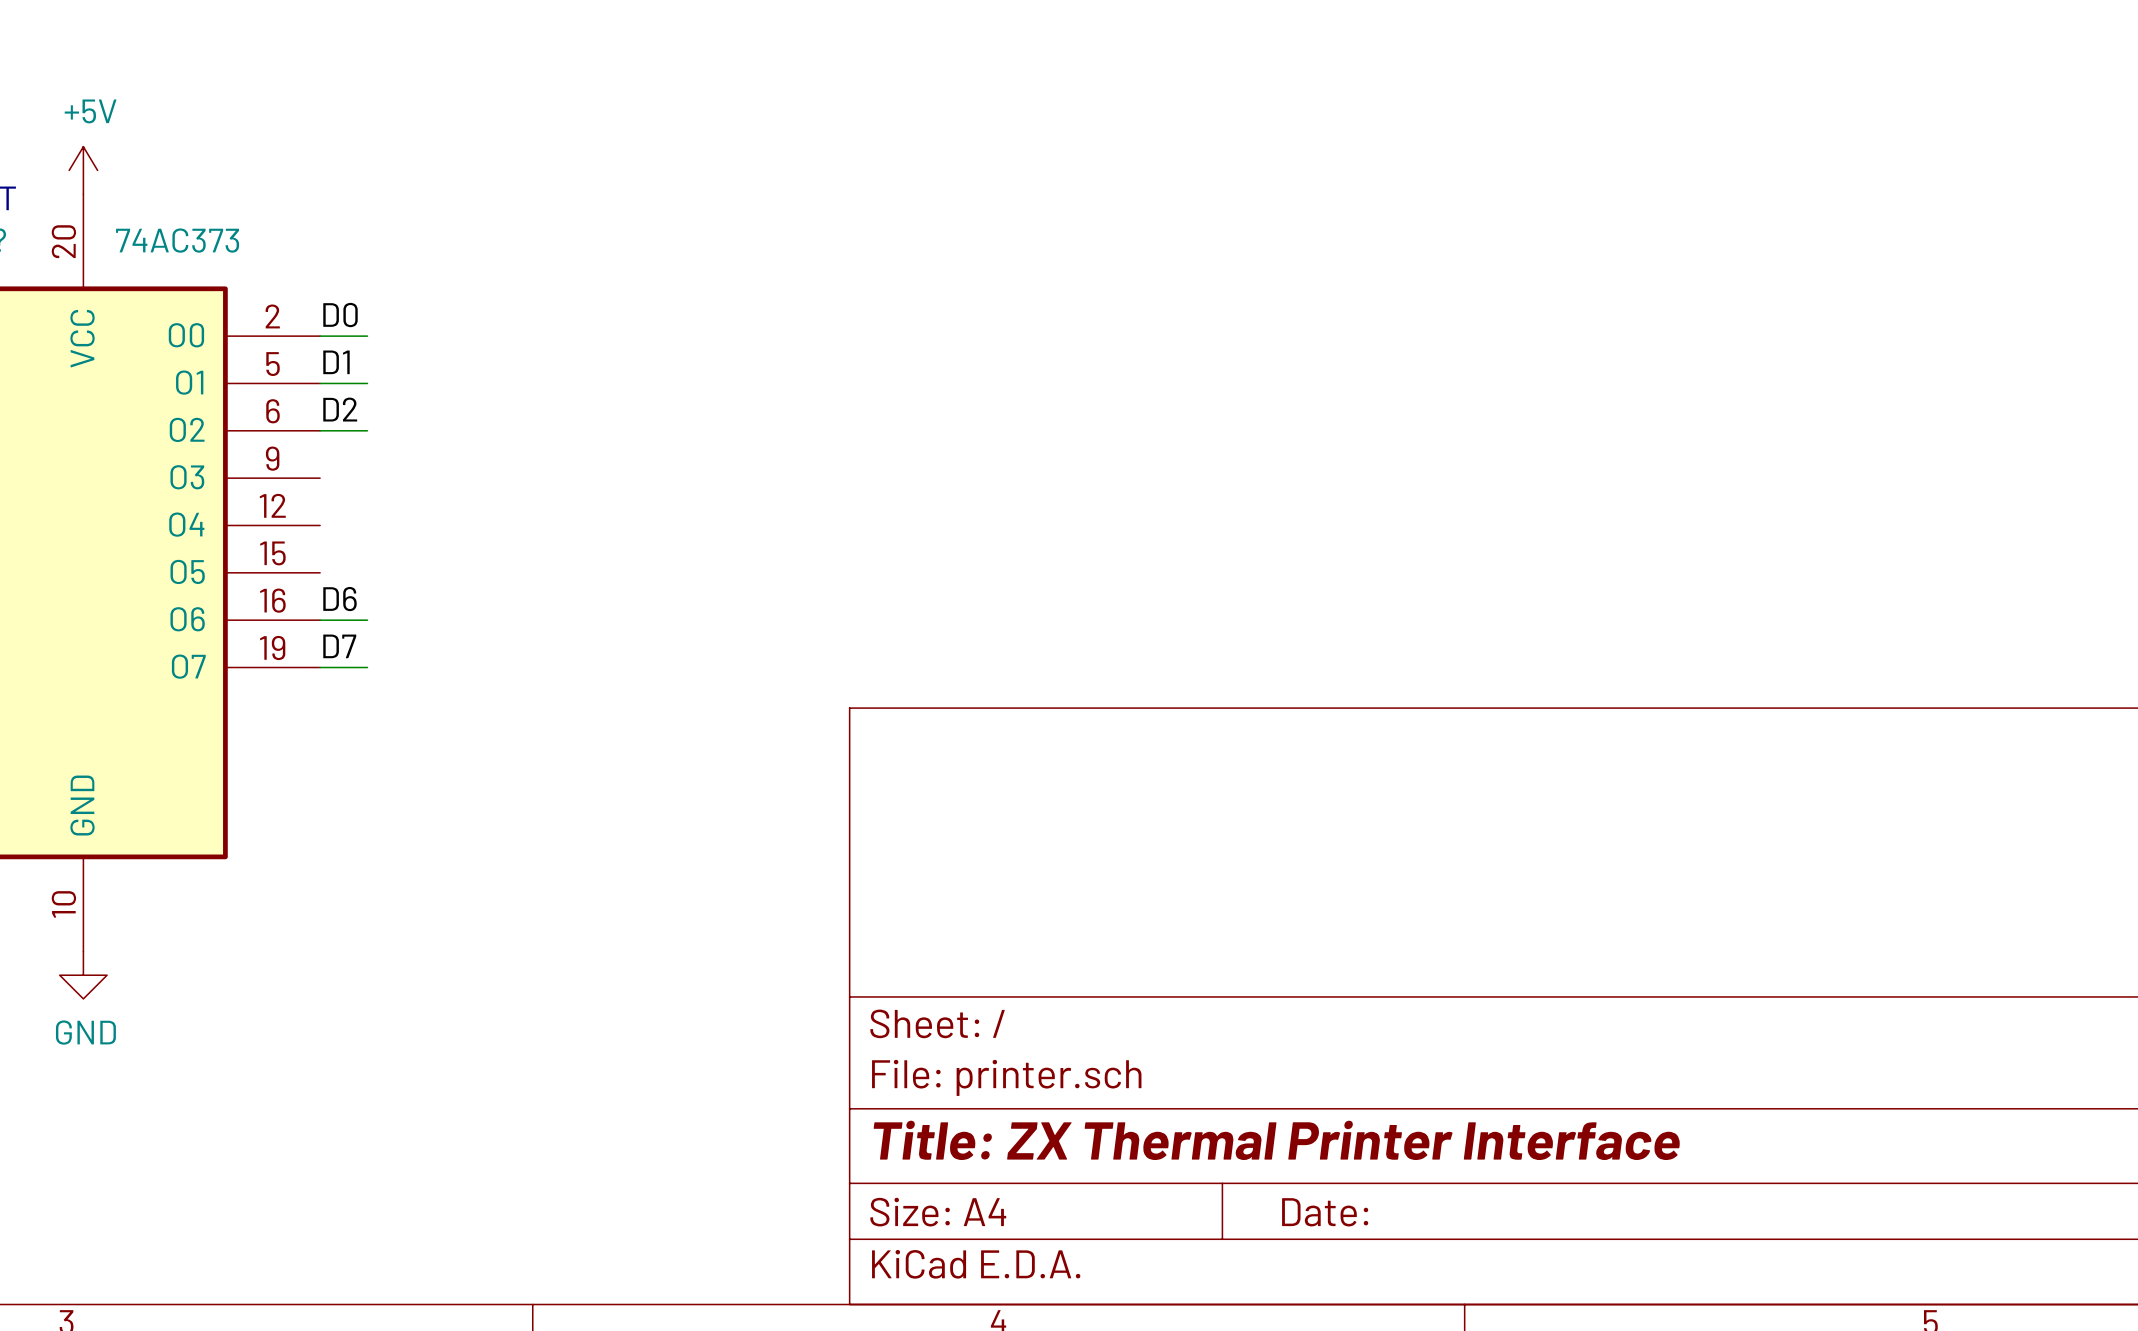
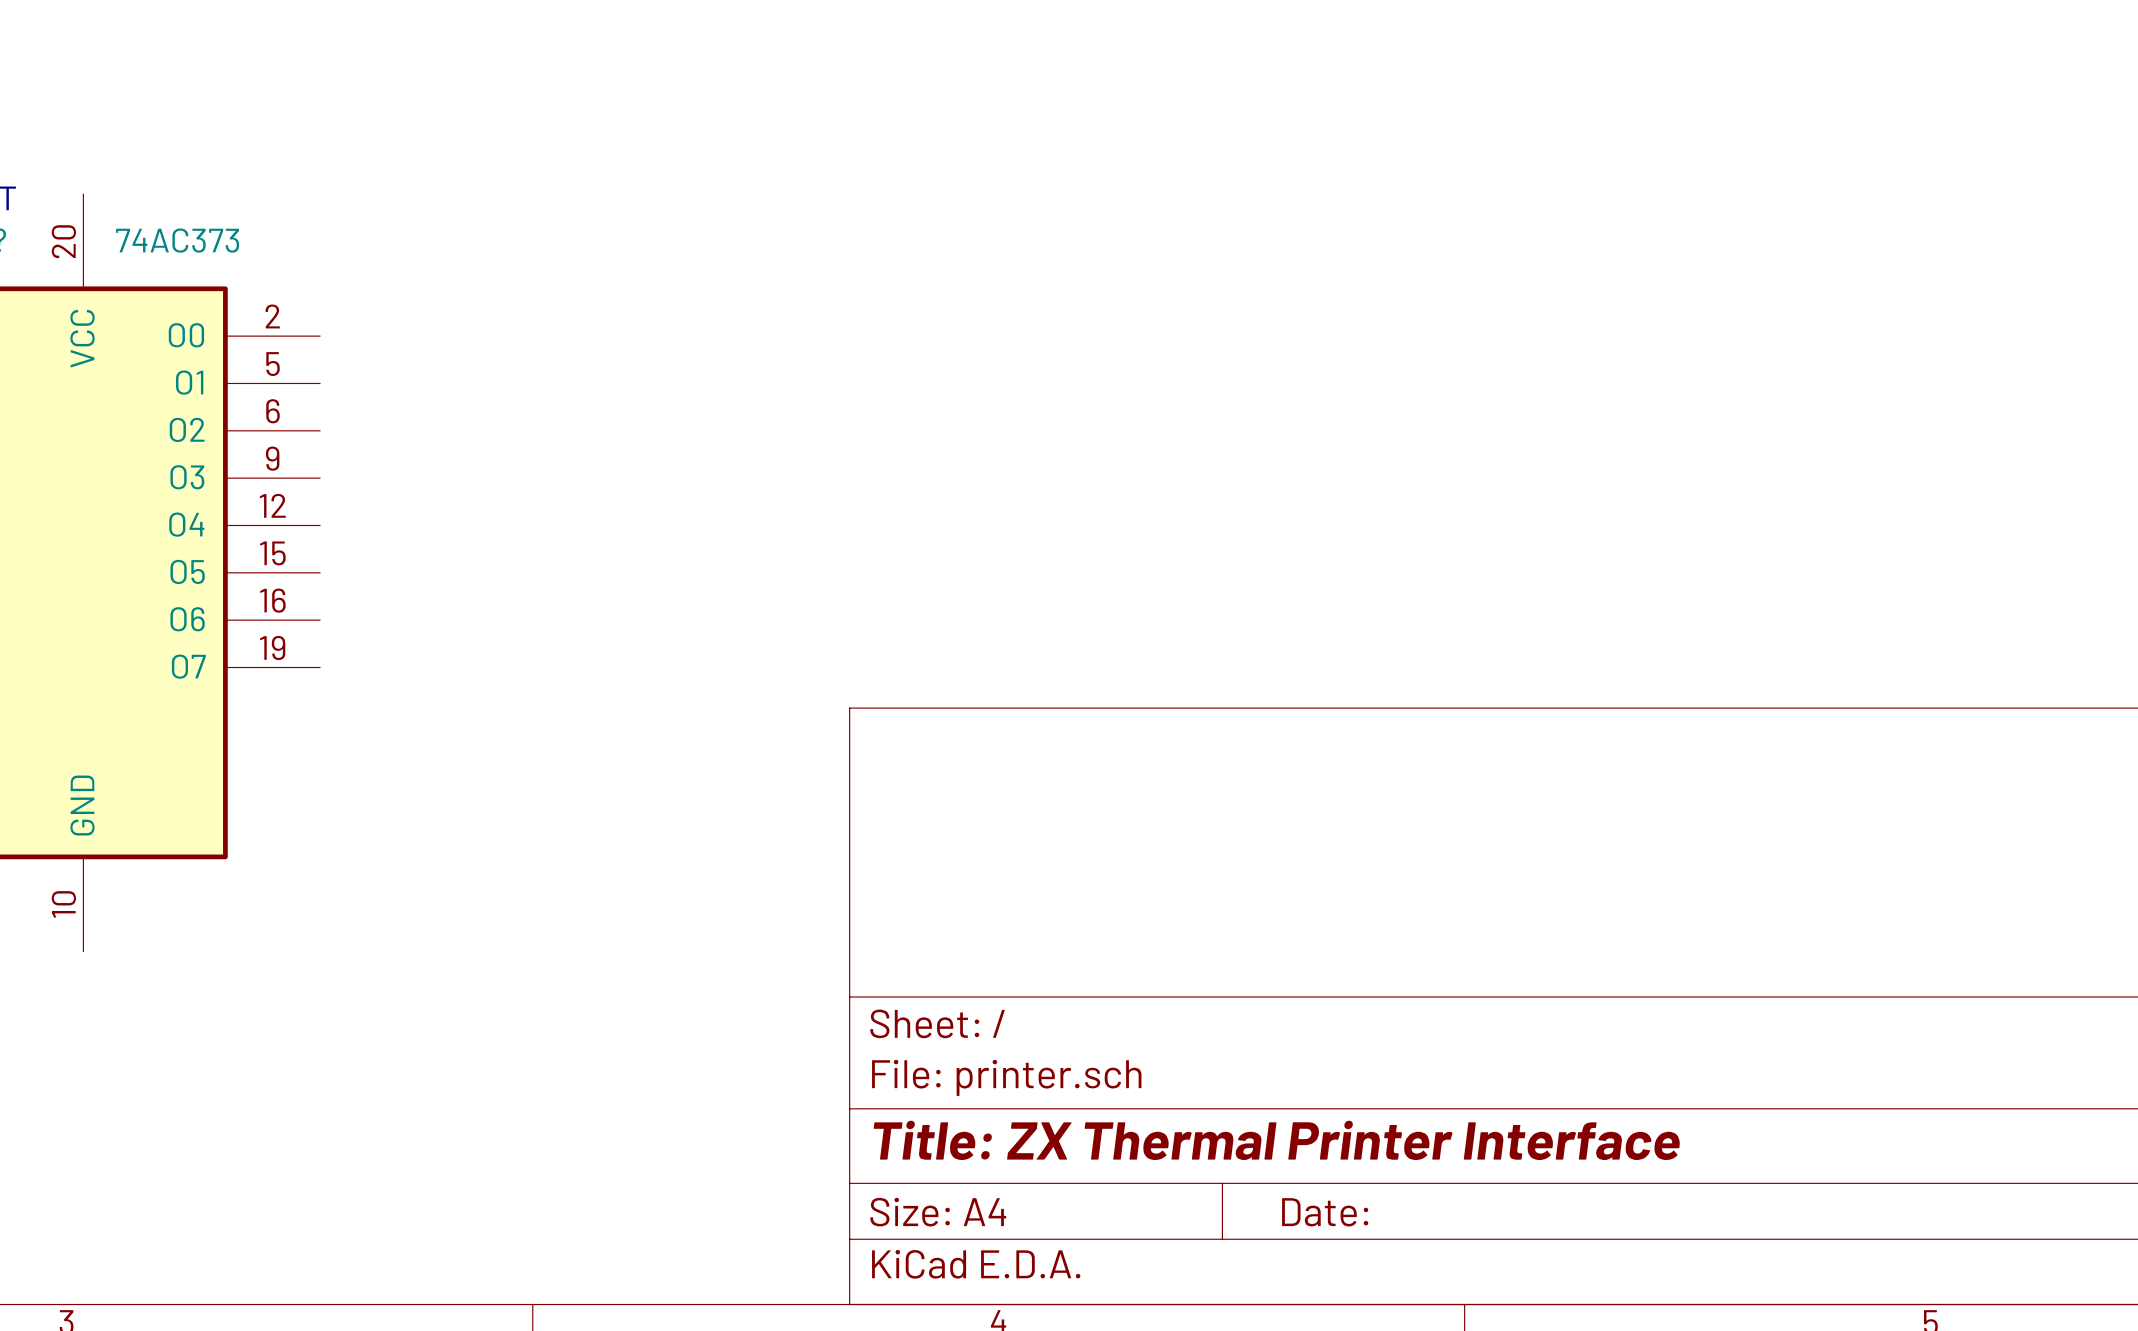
power symbol: +5V (83, 170) -> none
label: D0 (340, 315) -> none
wire: (320, 336) (367, 336) -> none
label: D1 (336, 362) -> none
wire: (320, 383) (367, 383) -> none
label: D2 (340, 409) -> none
wire: (320, 430) (367, 430) -> none
label: D6 (340, 599) -> none
wire: (320, 620) (367, 620) -> none
label: D7 (339, 646) -> none
wire: (320, 667) (367, 667) -> none
power symbol: GND (83, 975) -> none

